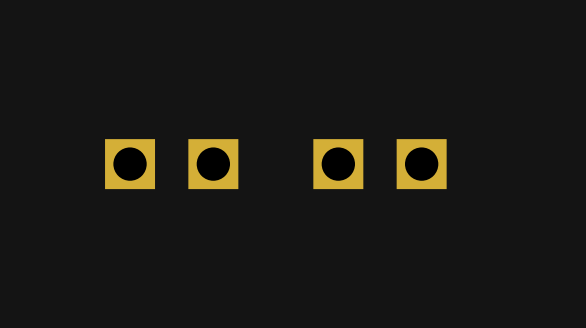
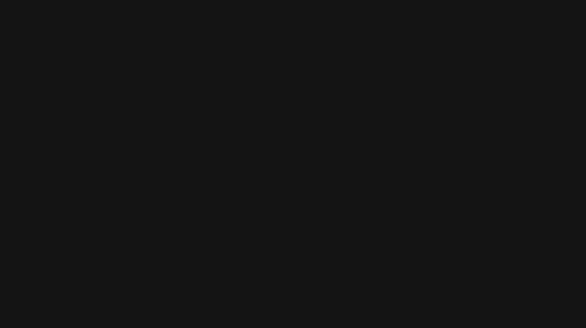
part: (171, 164) -> none
part: (379, 164) -> none

